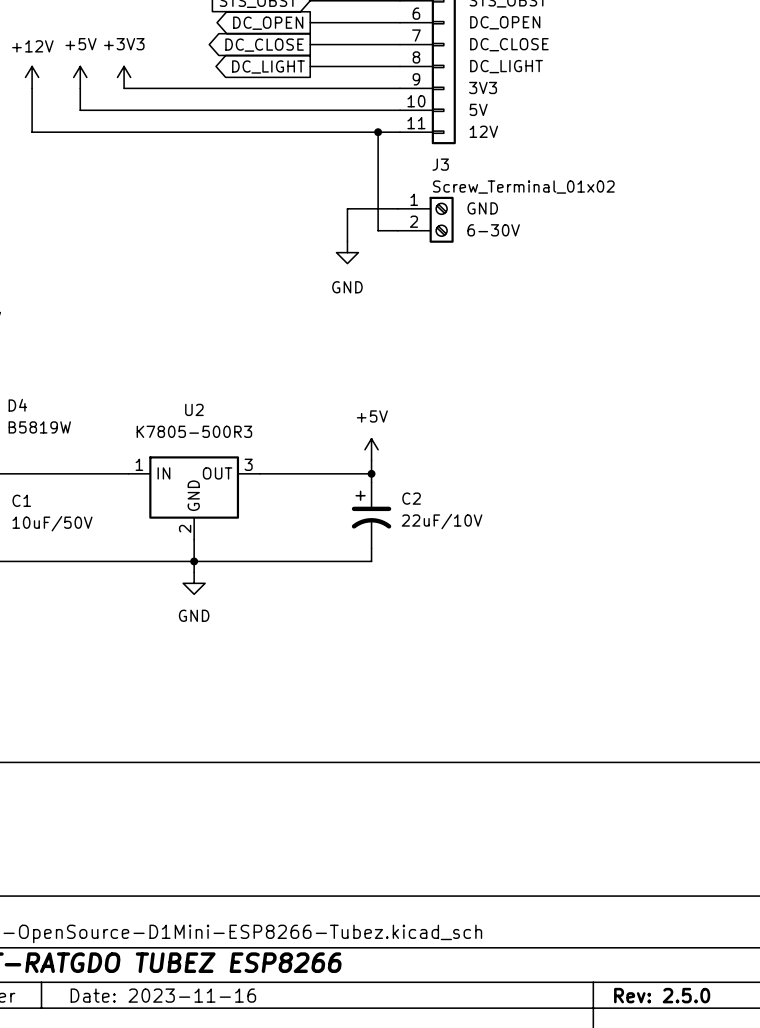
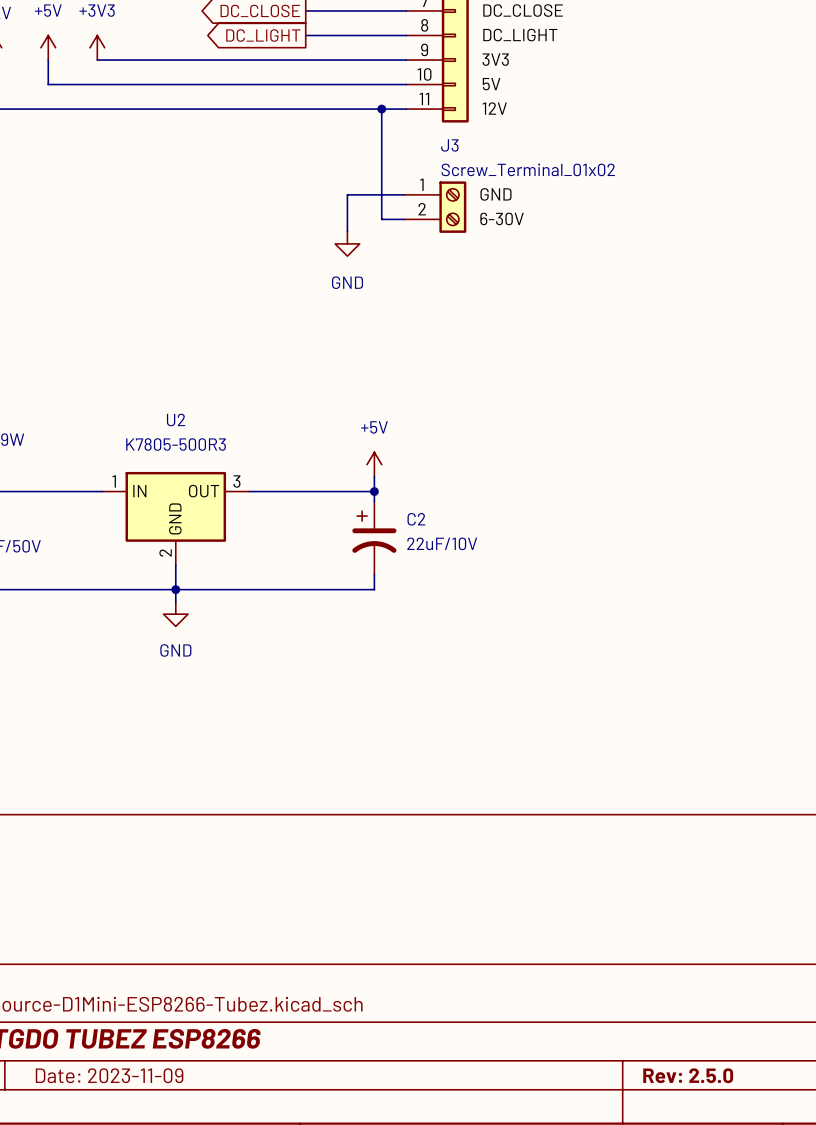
title block: Date: 2023-11-16 (163, 995) -> Date: 2023-11-09 (109, 1075)

